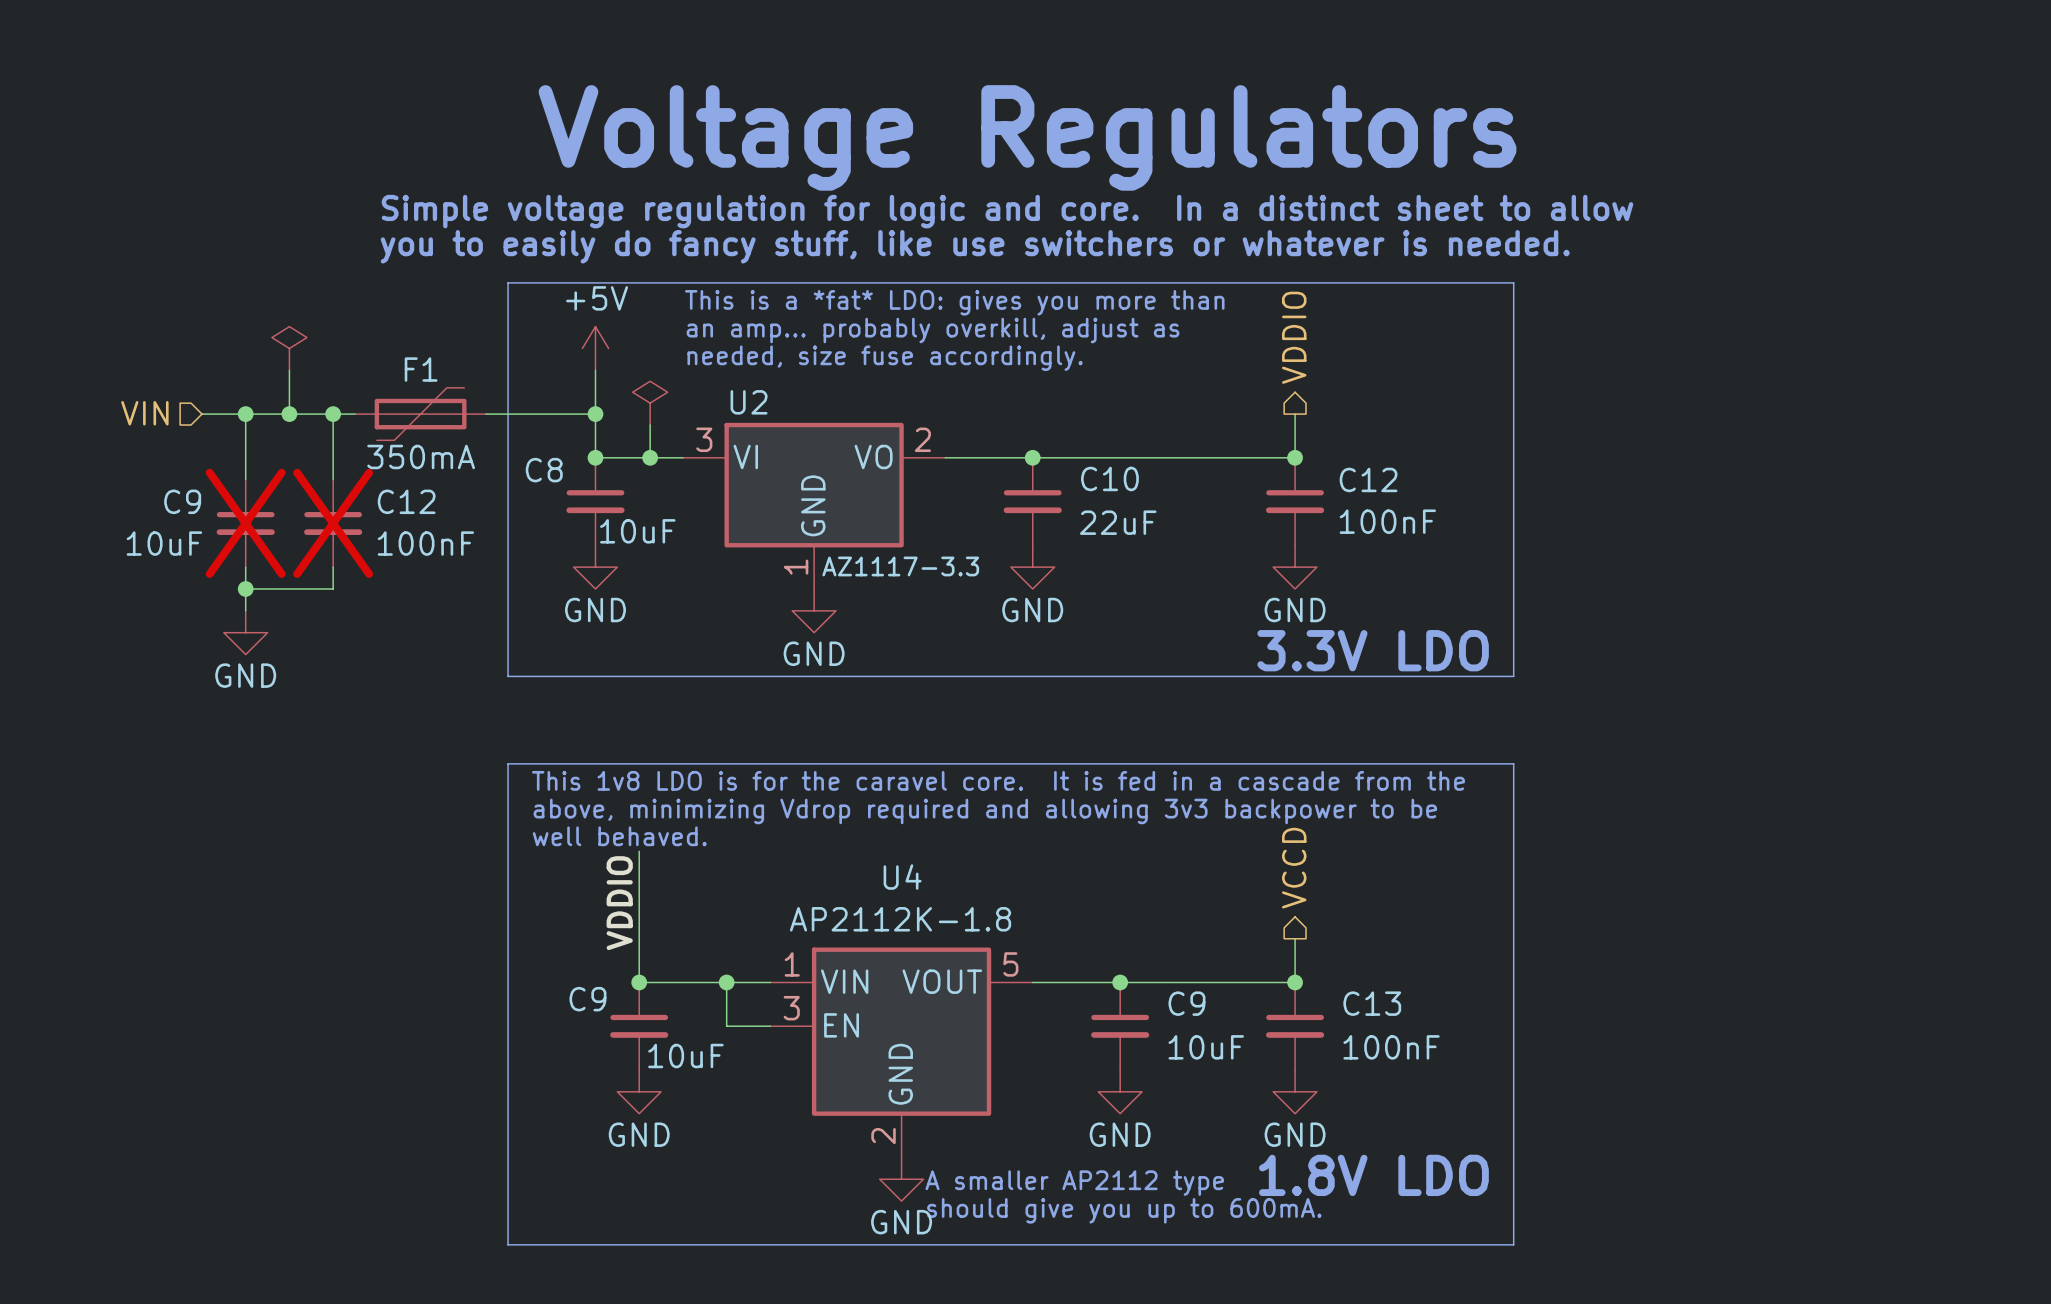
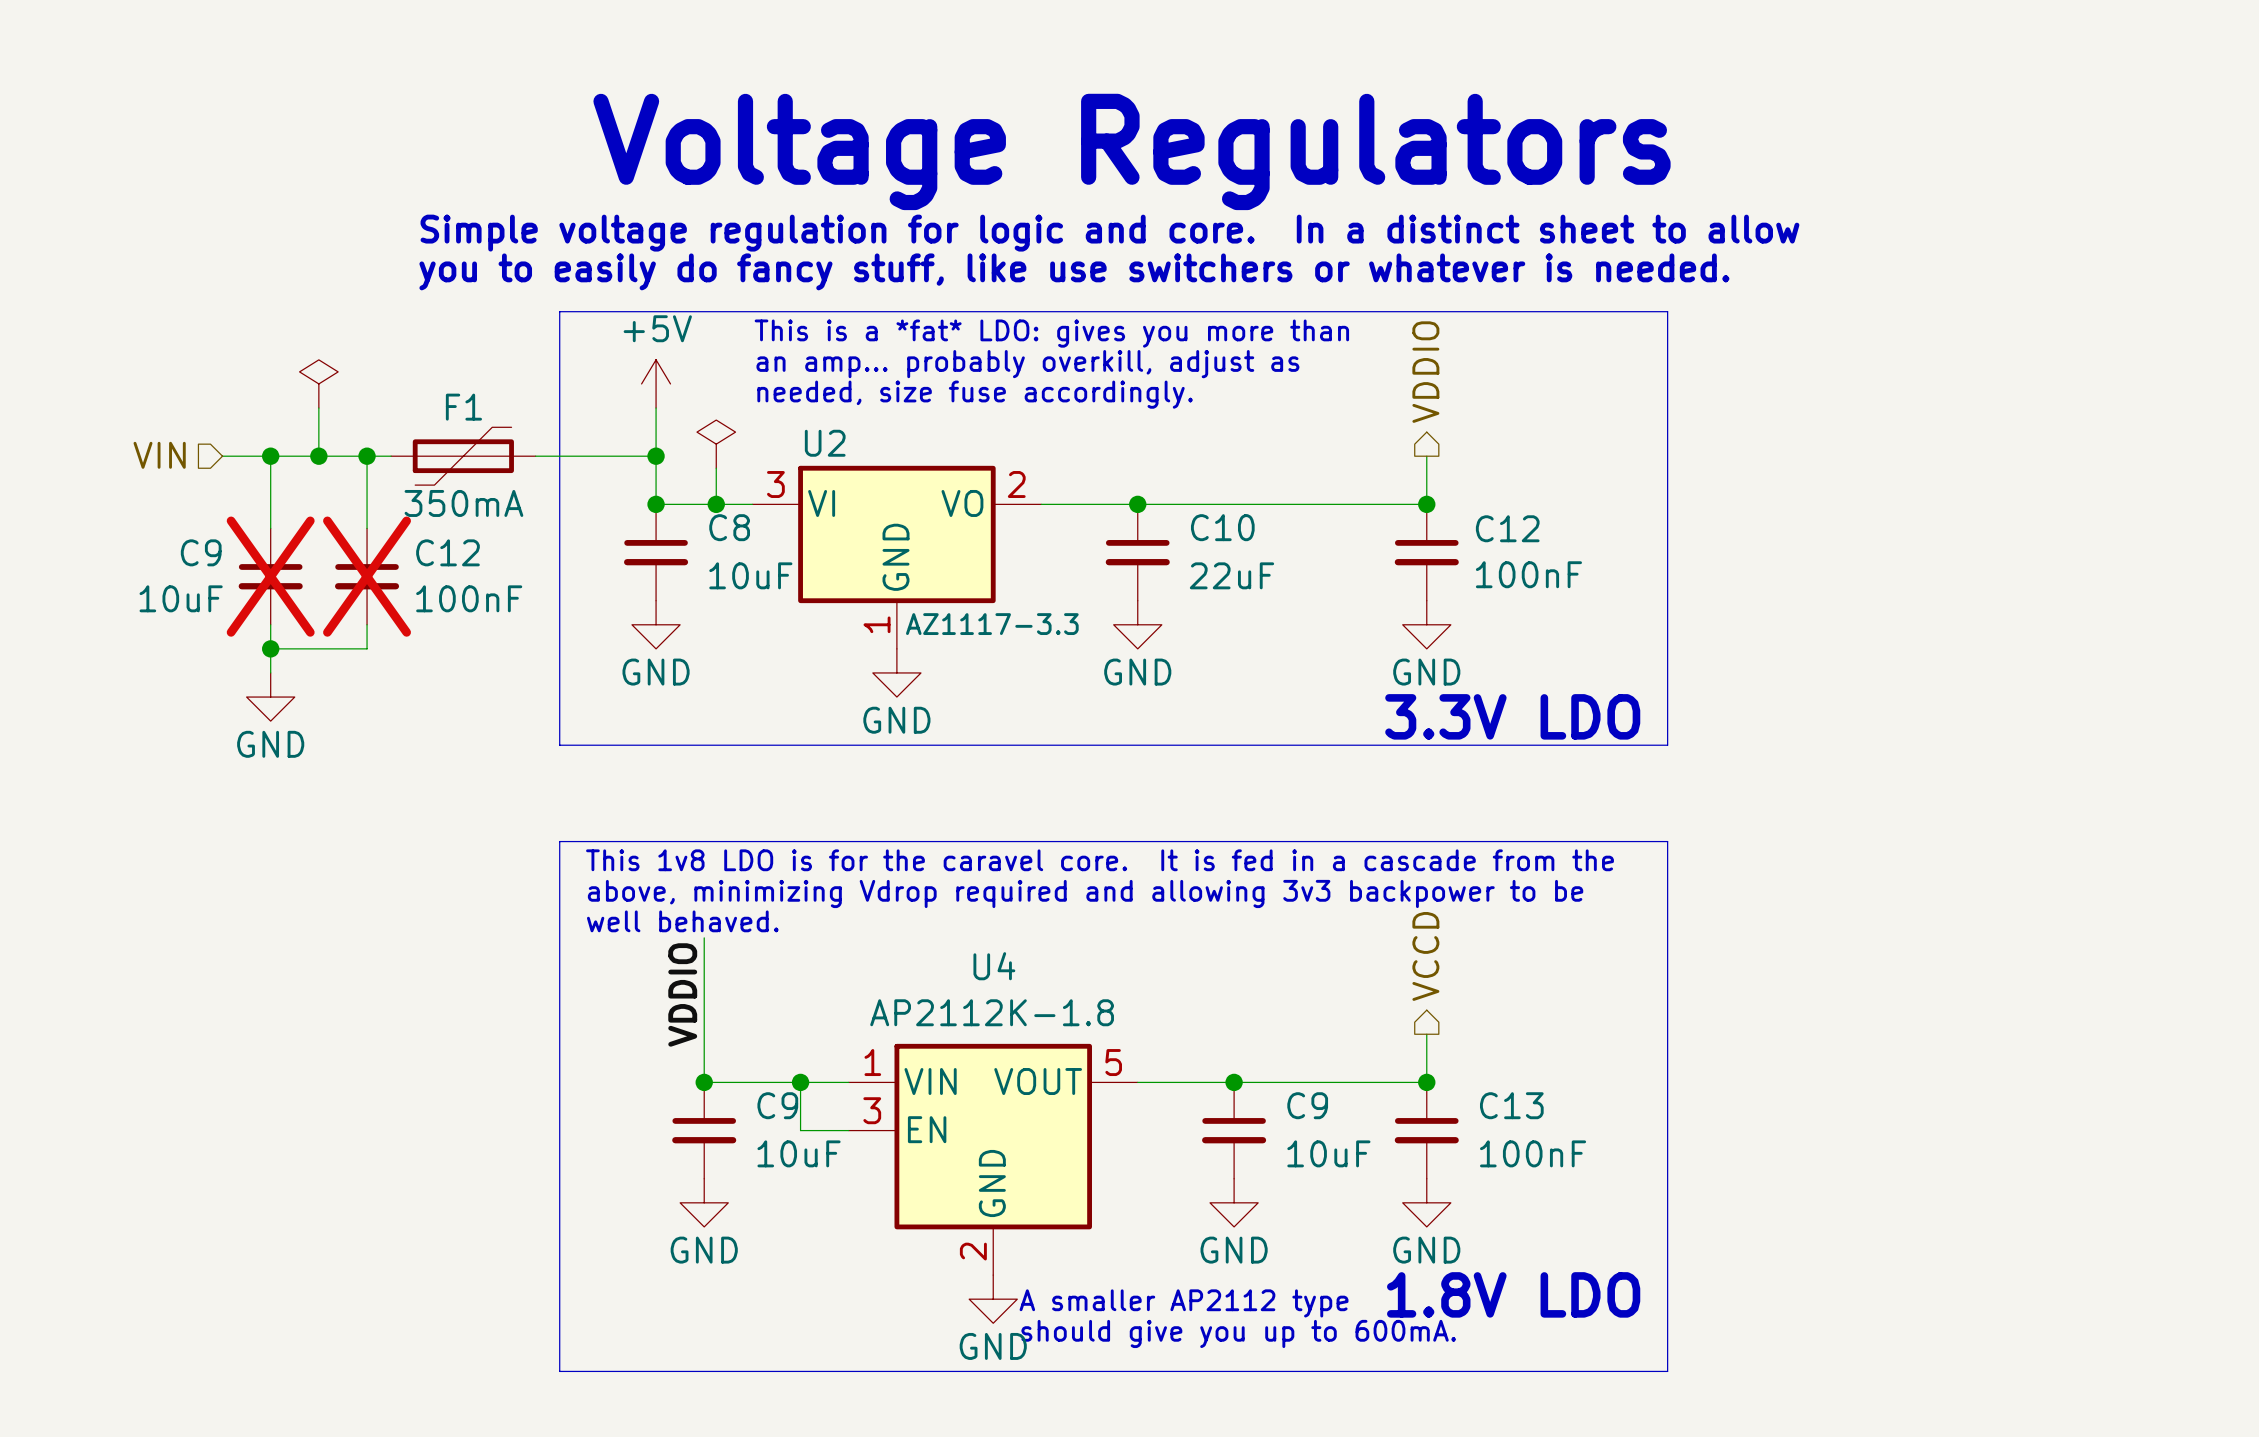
C8 name position: C8 (544, 470) -> C8 (729, 527)
C8 value position: 10uF (637, 531) -> 10uF (750, 575)
C9 name position: C9 (587, 999) -> C9 (777, 1105)
C9 value position: 10uF (685, 1056) -> 10uF (799, 1153)

